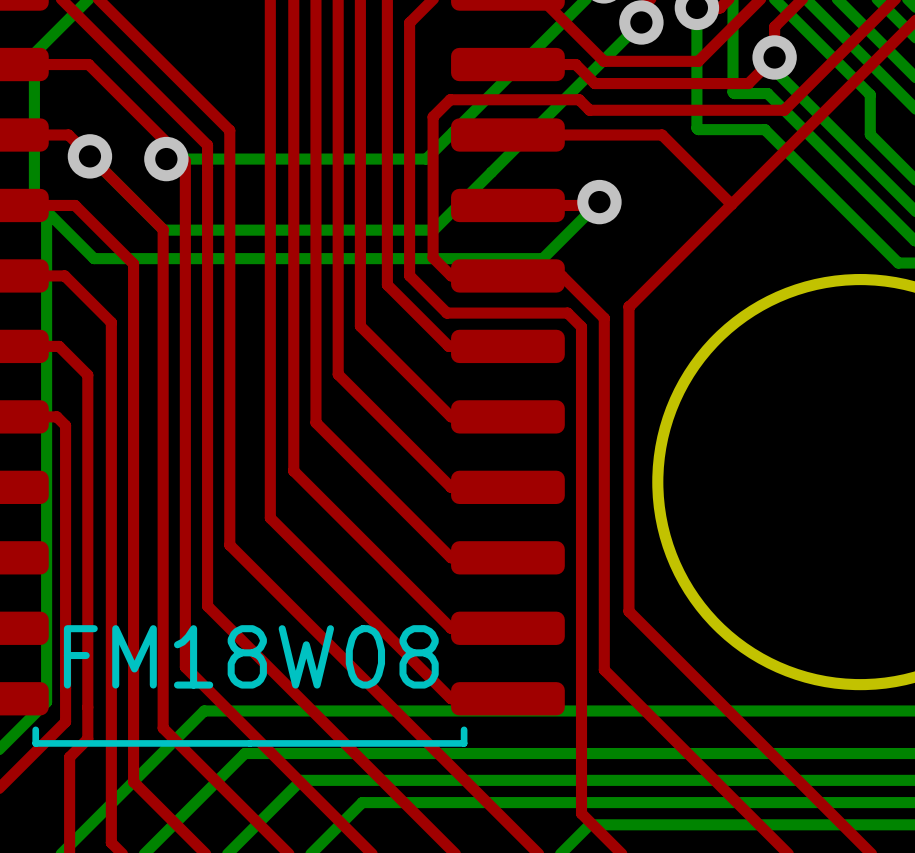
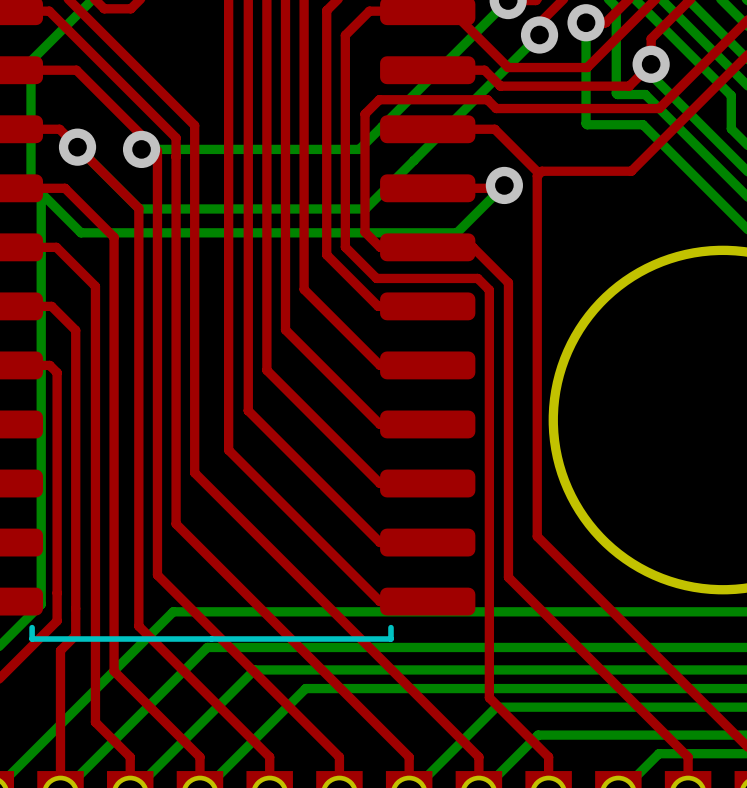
top track: (588, 135) (662, 135) (731, 204) -> (494, 129) (539, 173)
top track: (751, 185) (629, 306) -> none
top track: (628, 306) (628, 611) (638, 621) -> (631, 171) (541, 171) (537, 175) (537, 536)
text: FM18W08 (251, 656) -> none

